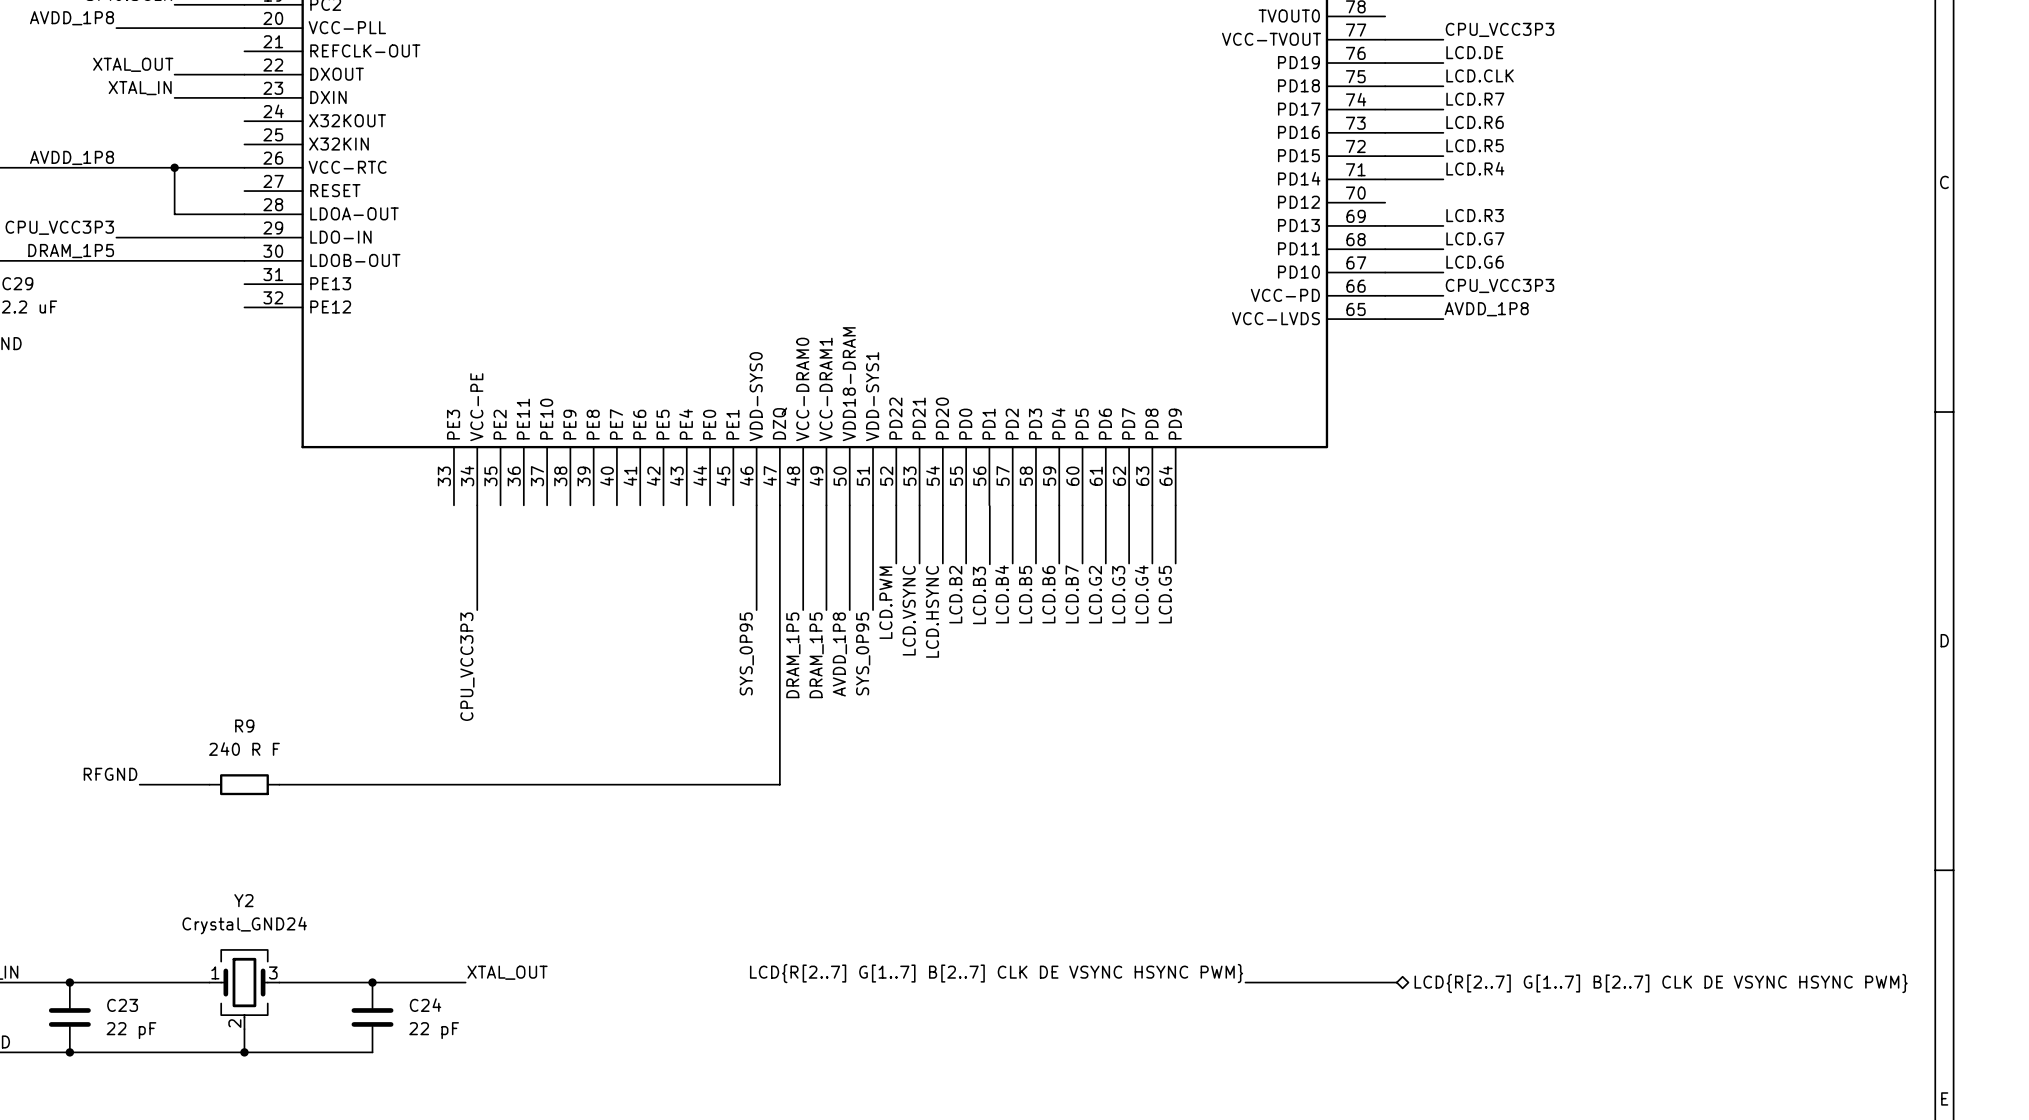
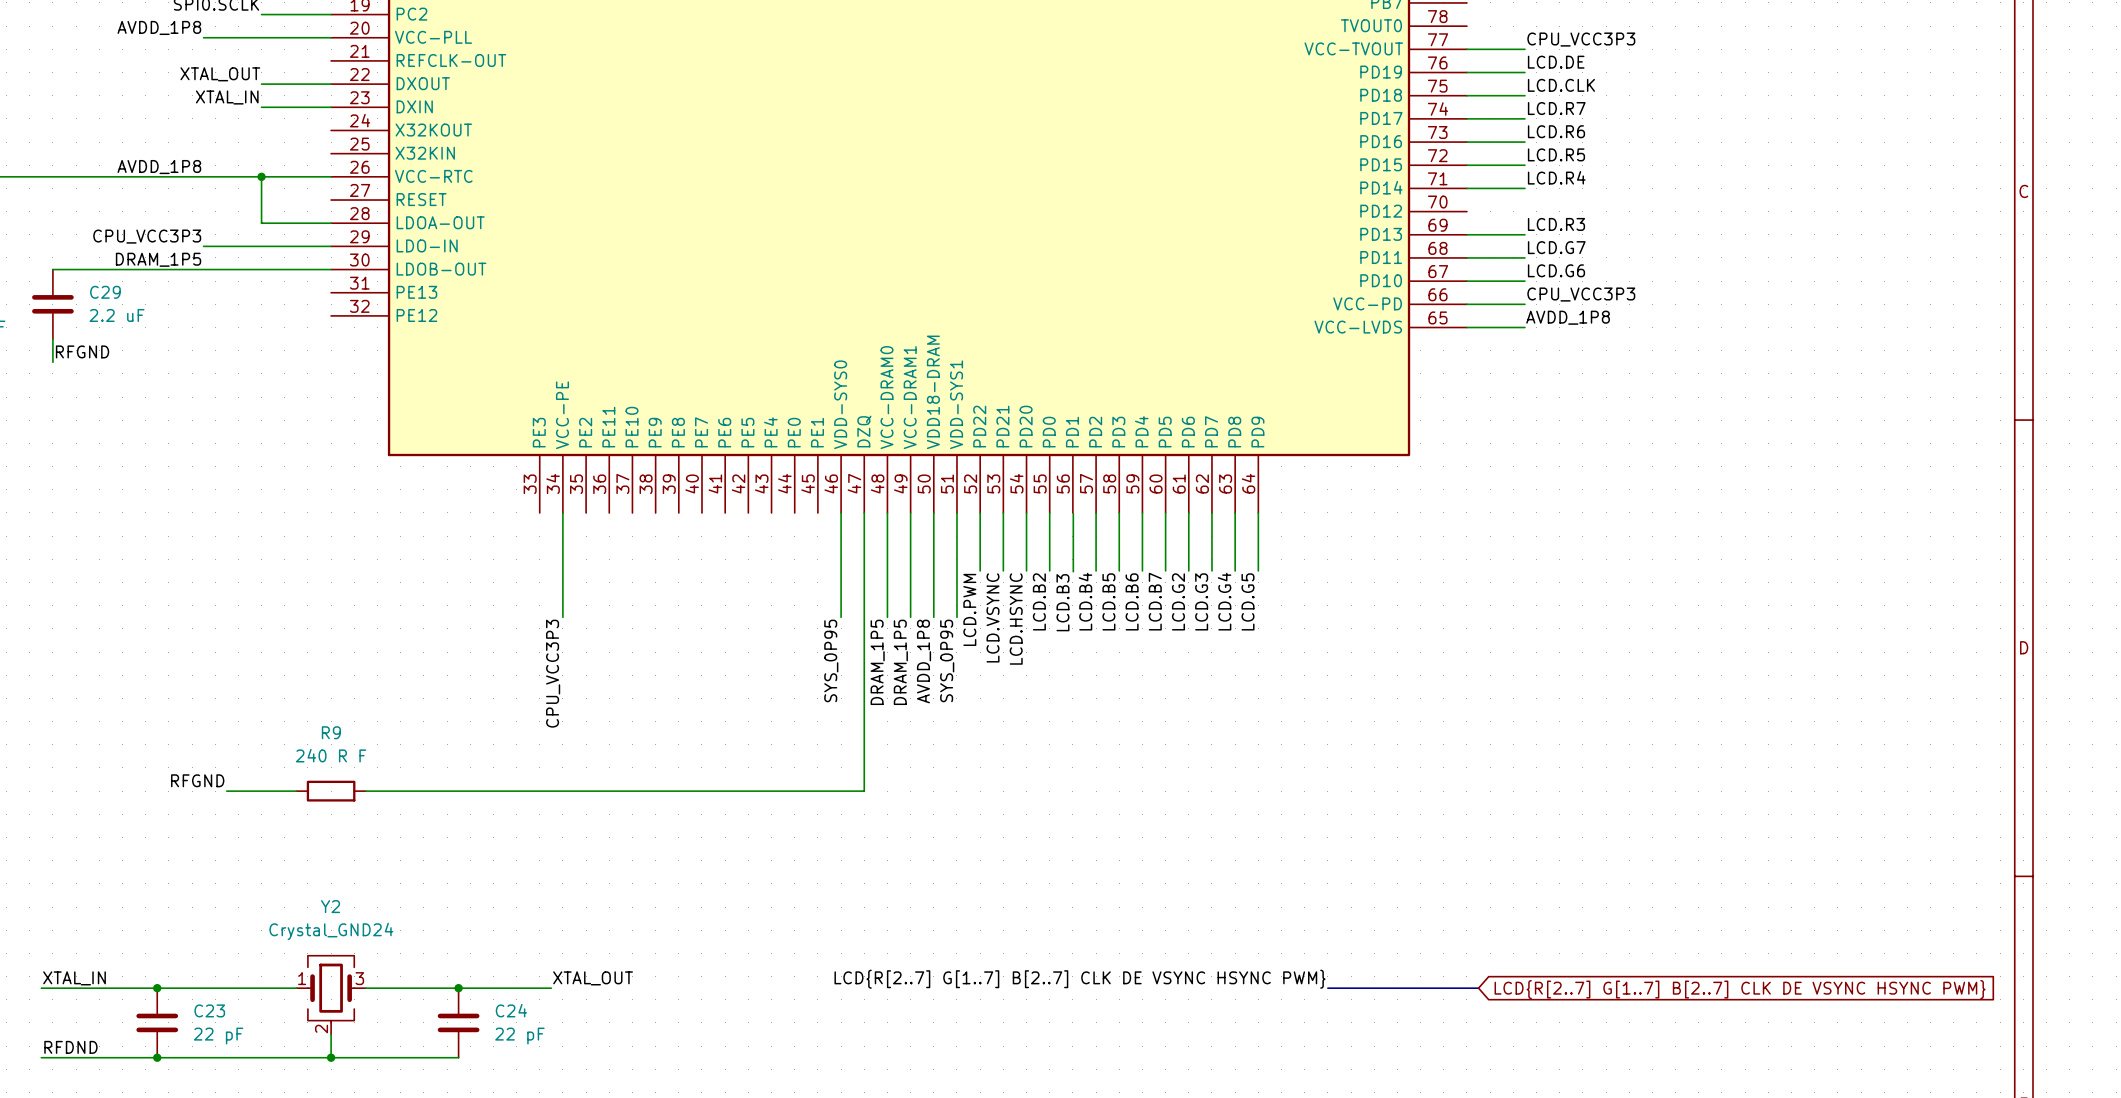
global label: none -> LCD{R[2..7] G[1..7] B[2..7] CLK DE VSYNC HSYNC PWM} (1740, 989)
hierarchical label: LCD{R[2..7] G[1..7] B[2..7] CLK DE VSYNC HSYNC PWM} (1661, 983) -> none

